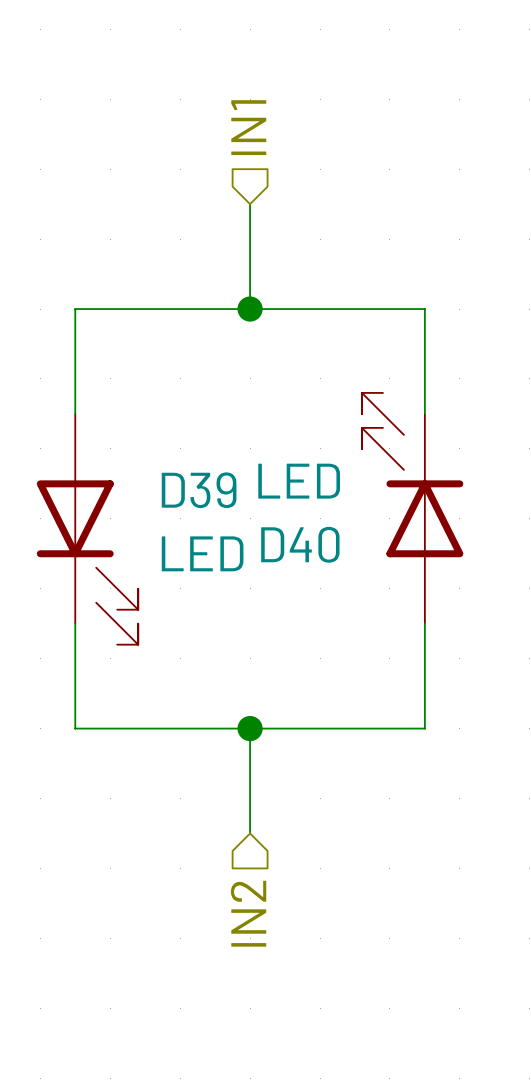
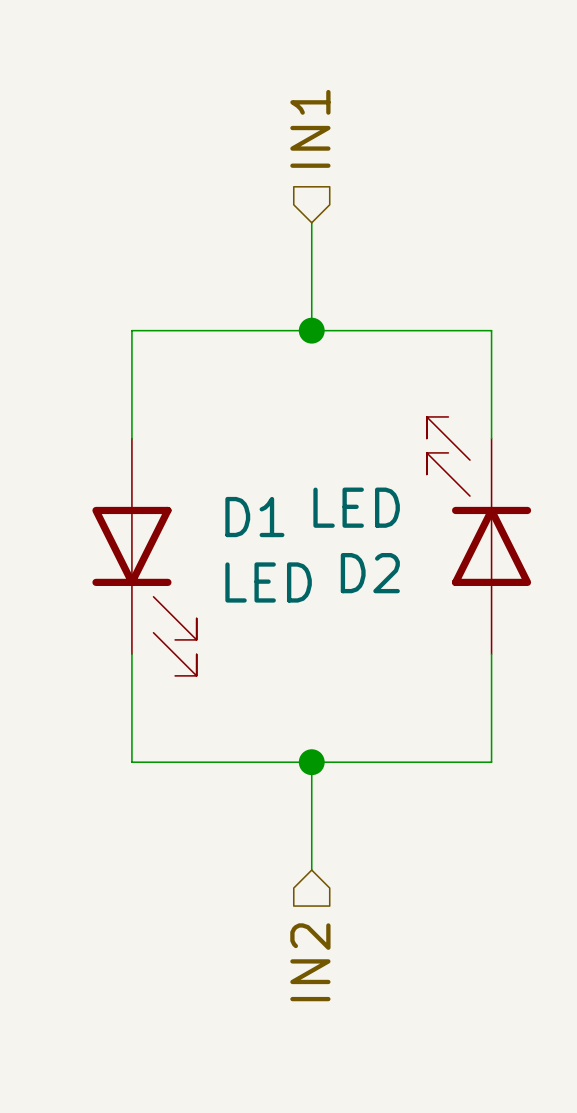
D39 name: D39 (199, 490) -> D1 (254, 517)
D40 name: D40 (300, 544) -> D2 (370, 573)

